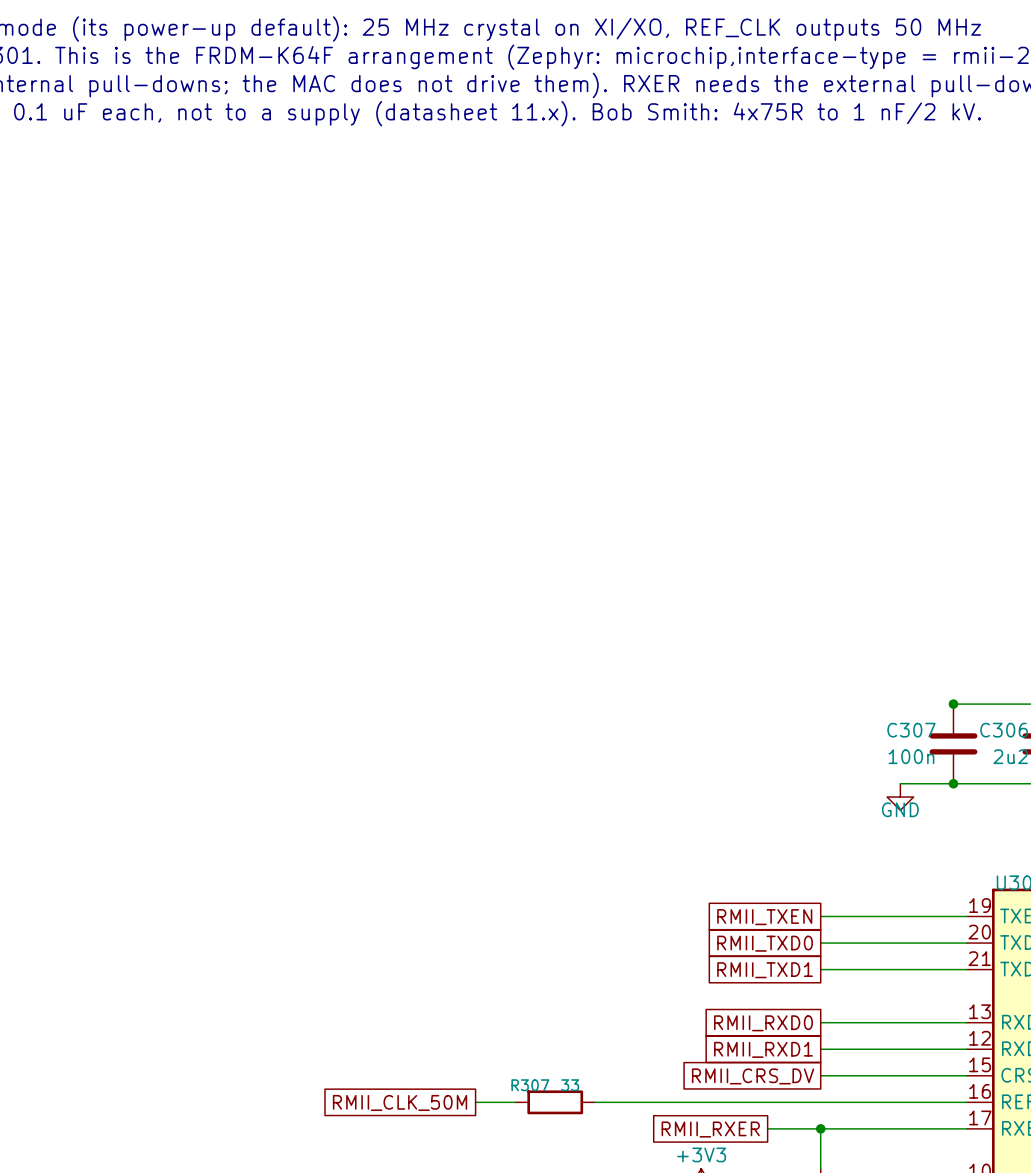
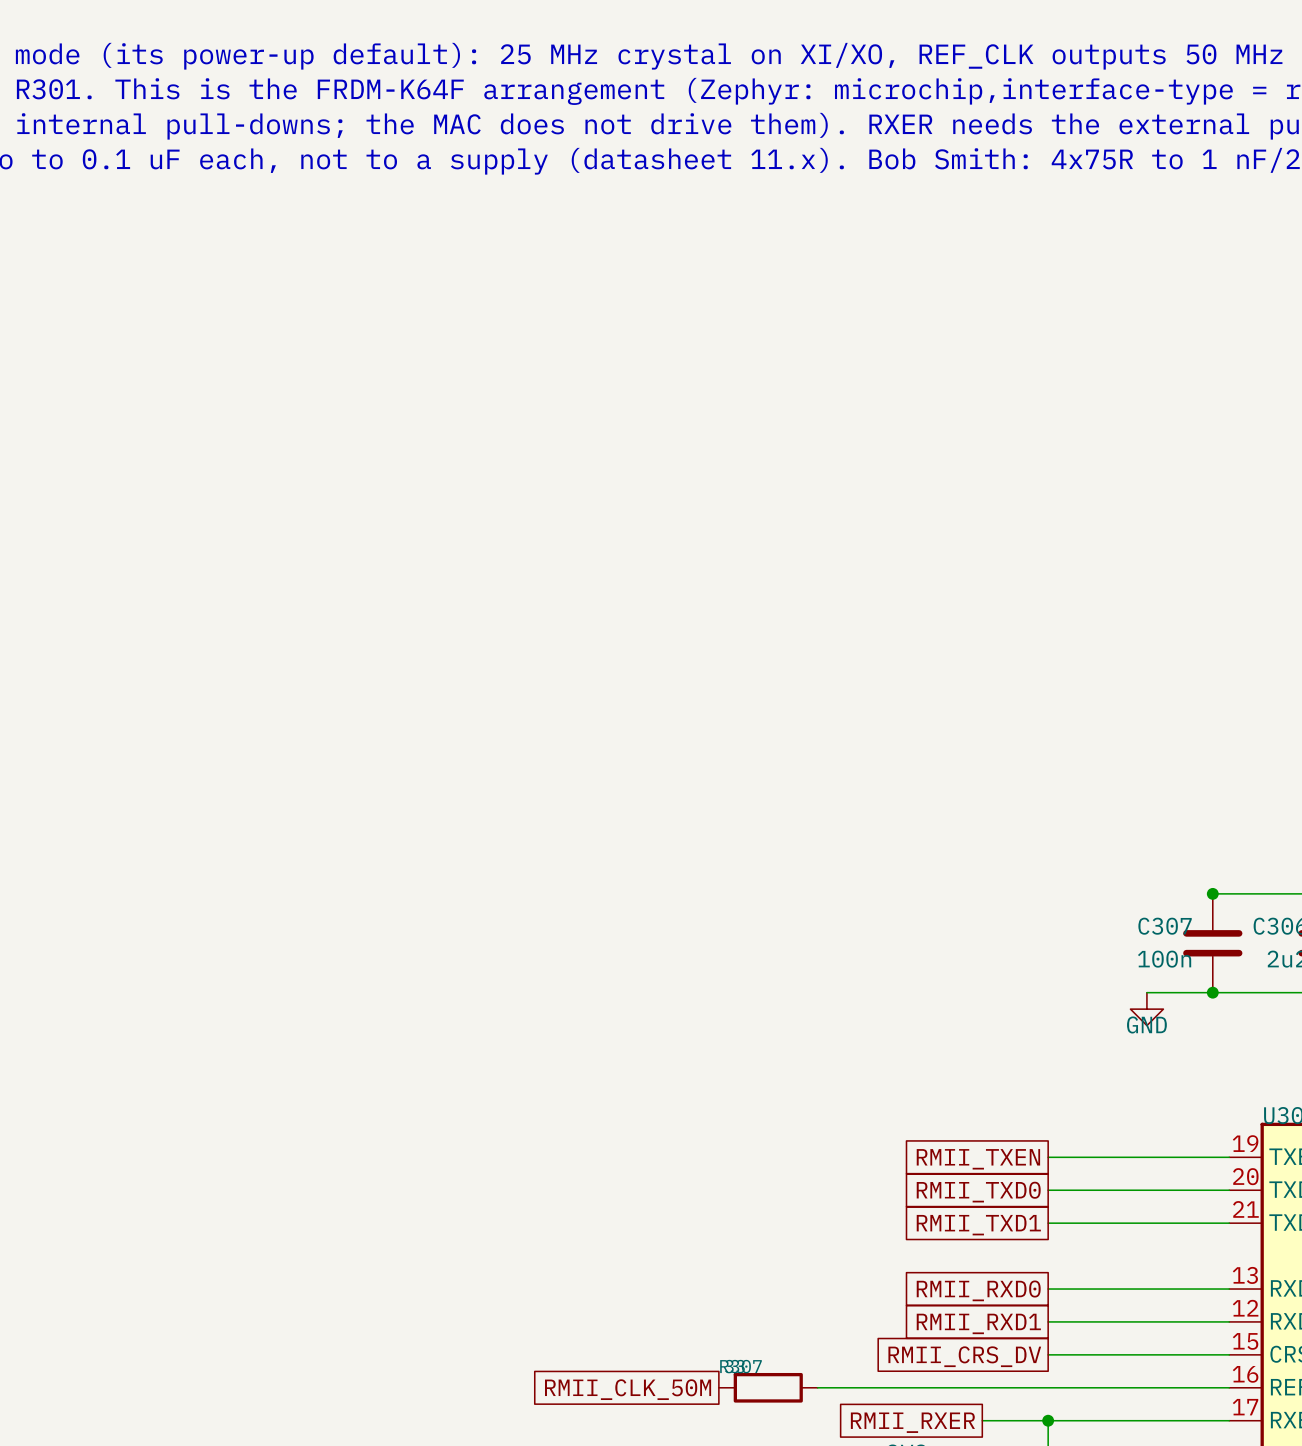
global label position: RMII_CLK_50M (400, 1102) -> RMII_CLK_50M (628, 1389)
wire: (475, 1102) (515, 1102) -> none
R307 position: (555, 1102) -> (768, 1387)
wire: (595, 1102) (634, 1102) -> none

